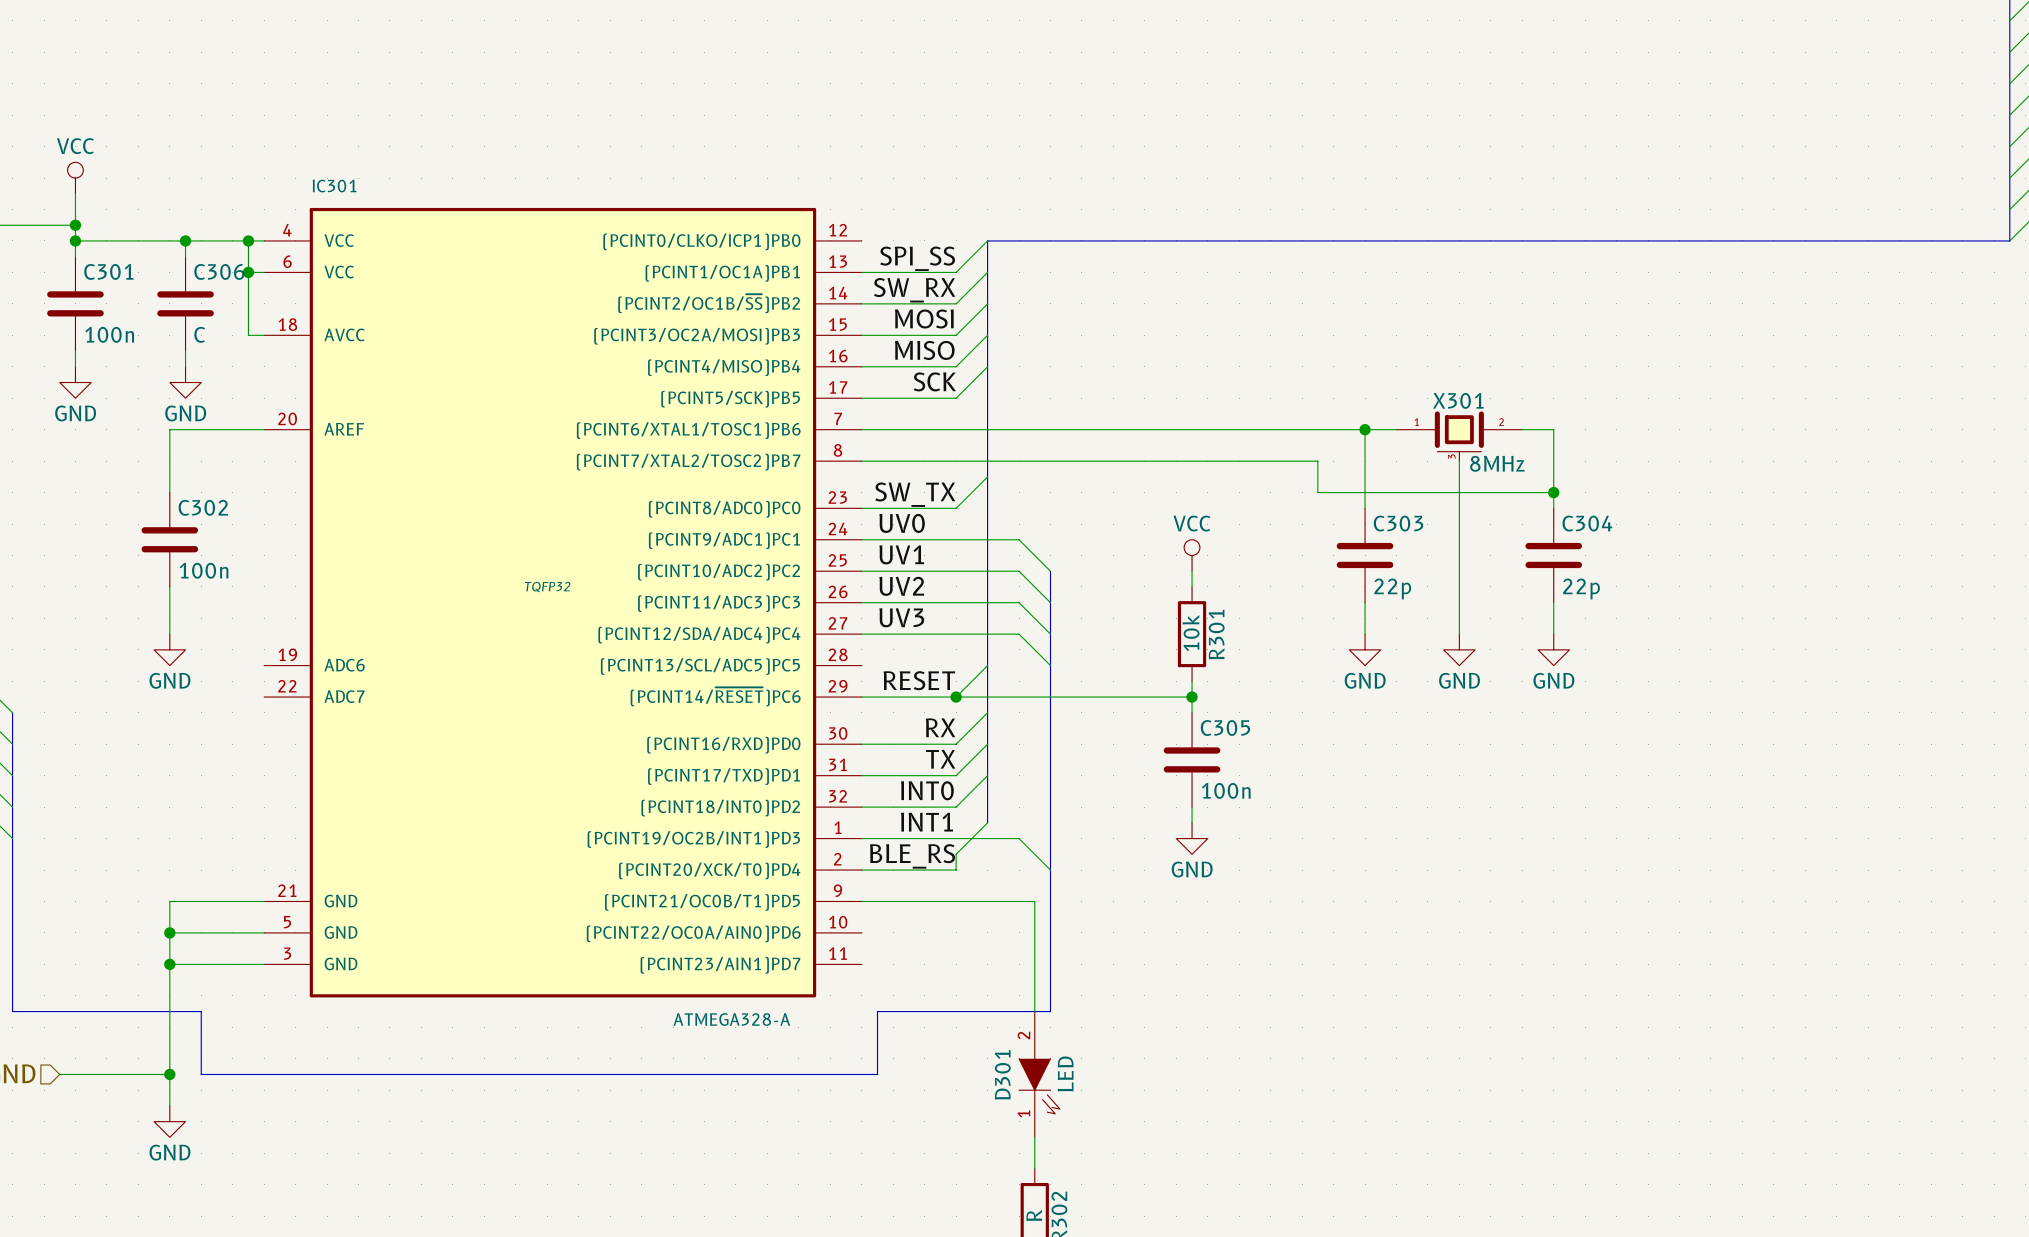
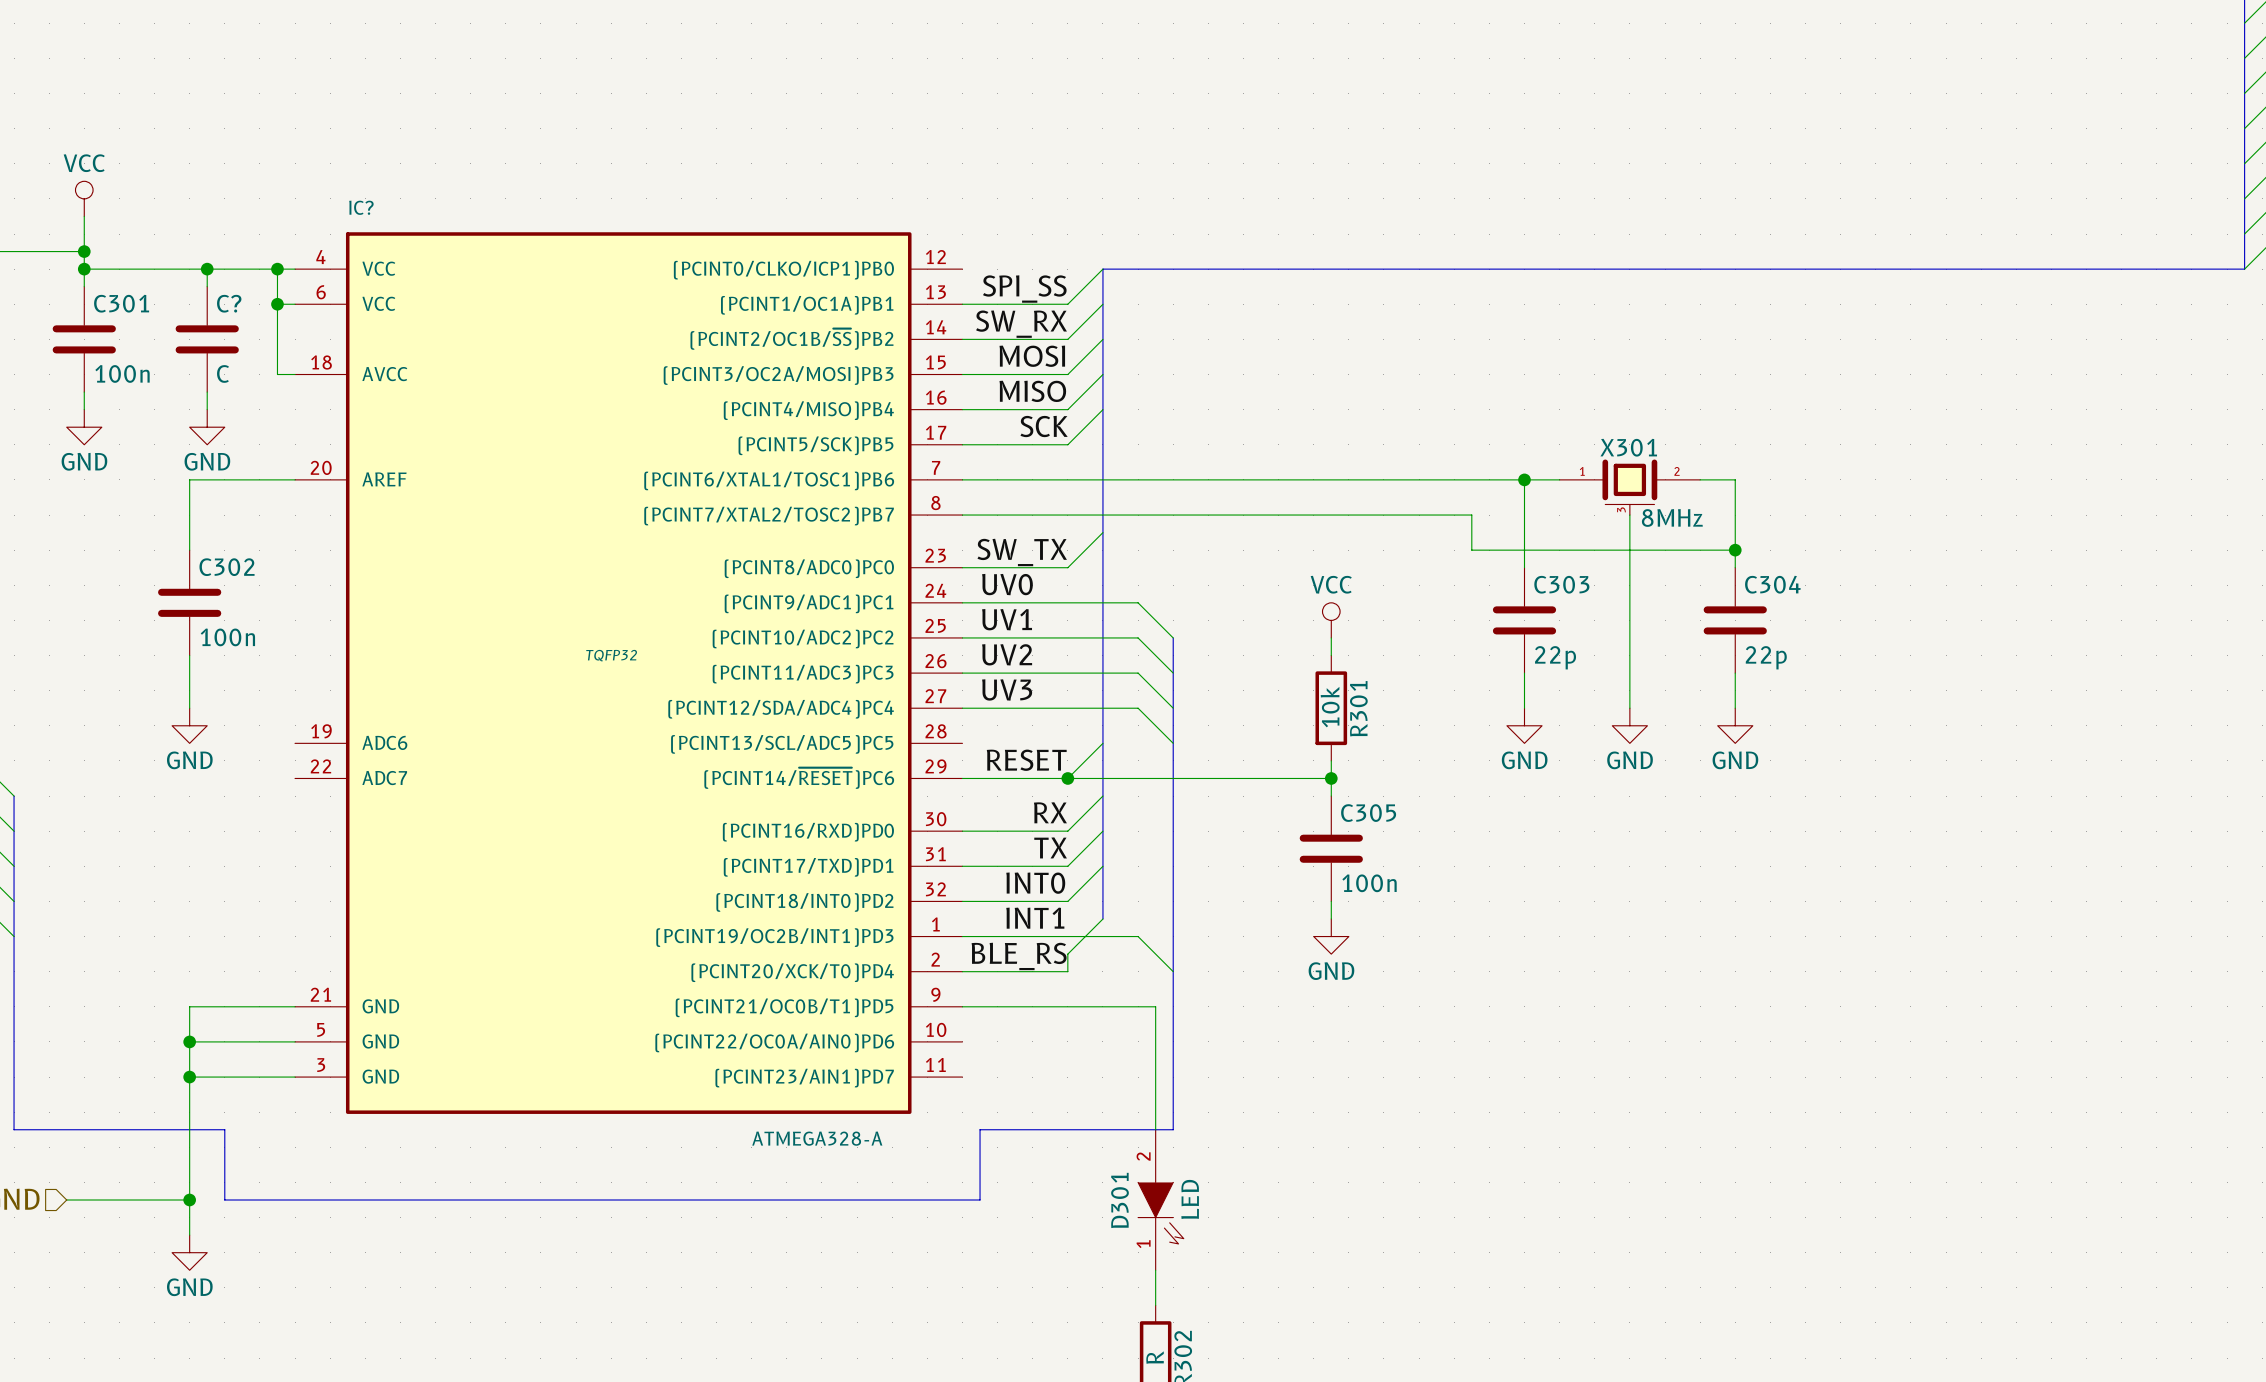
IC301 name: IC301 (334, 186) -> IC? (361, 207)
C306 name: C306 (219, 271) -> C? (229, 303)

